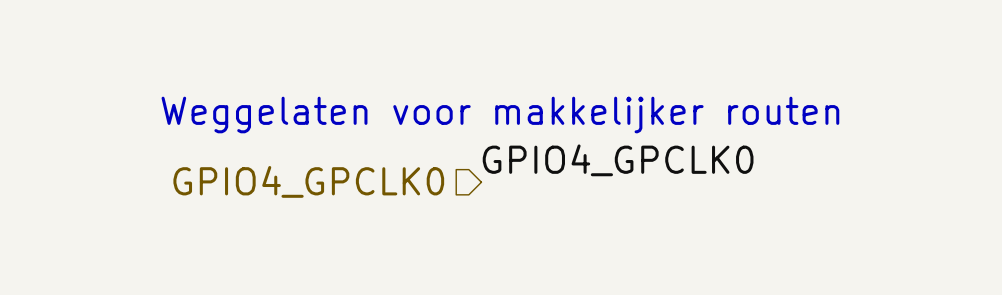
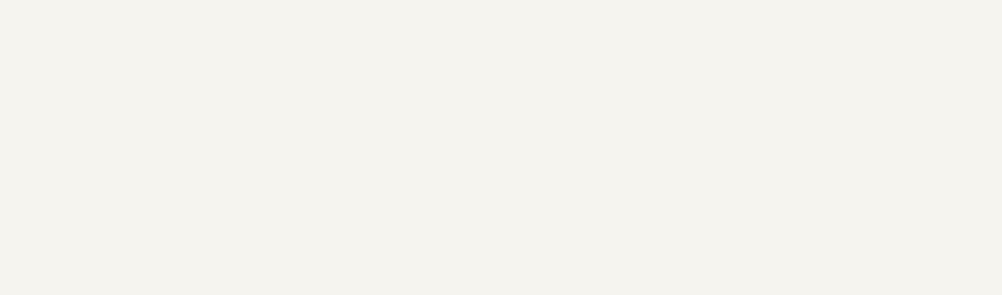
text: Weggelaten voor makkelijker routen (500, 114) -> none
label: GPIO4_GPCLK0 (618, 160) -> none
hierarchical label: GPIO4_GPCLK0 (308, 181) -> none

